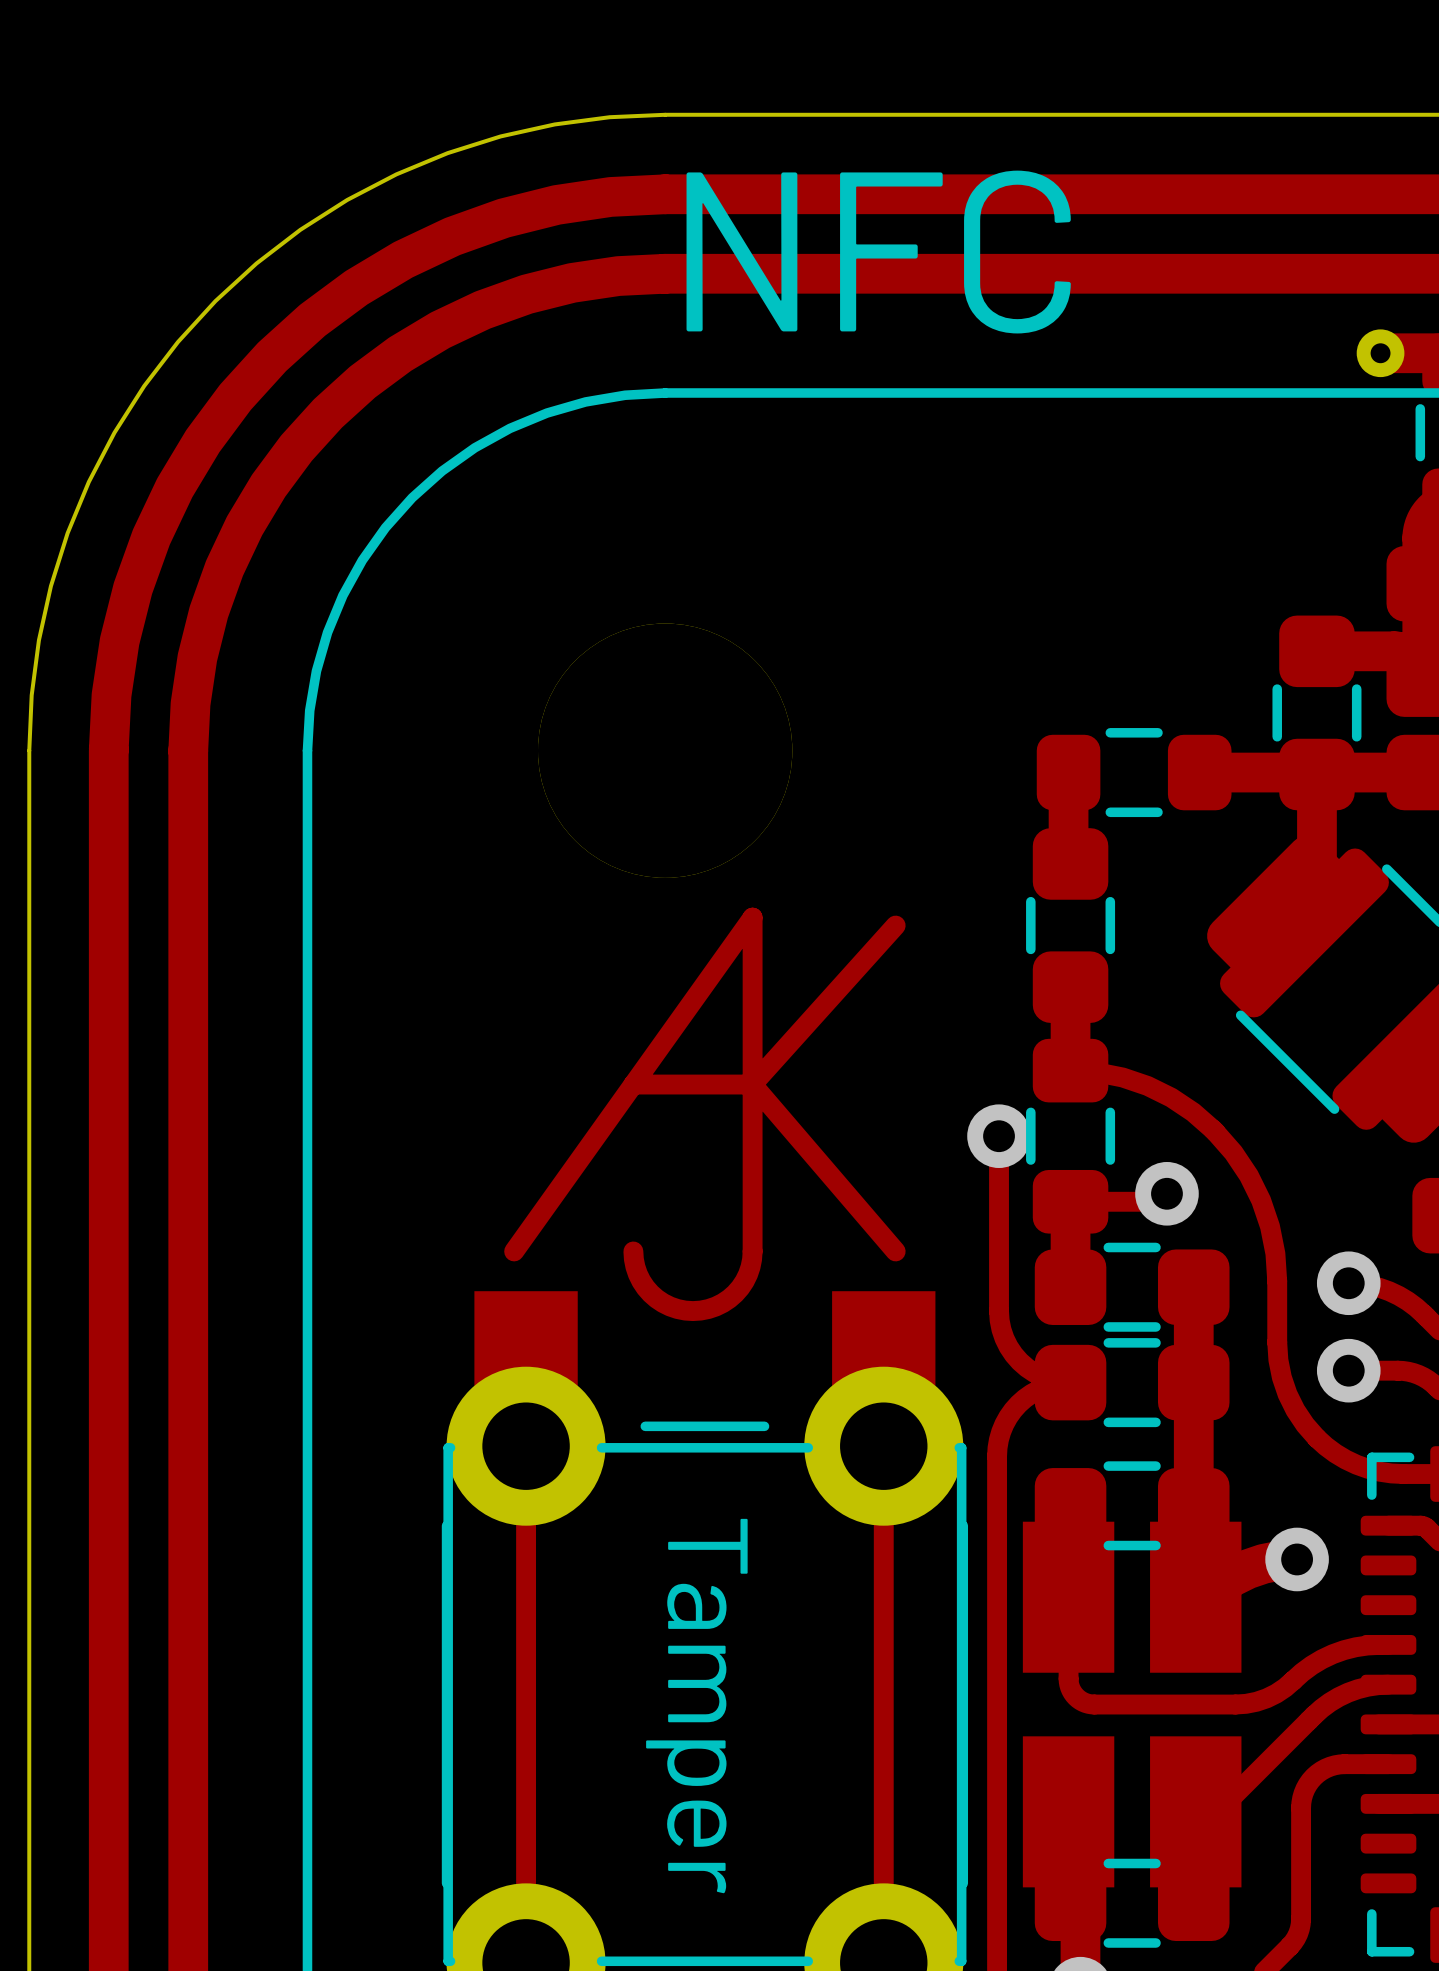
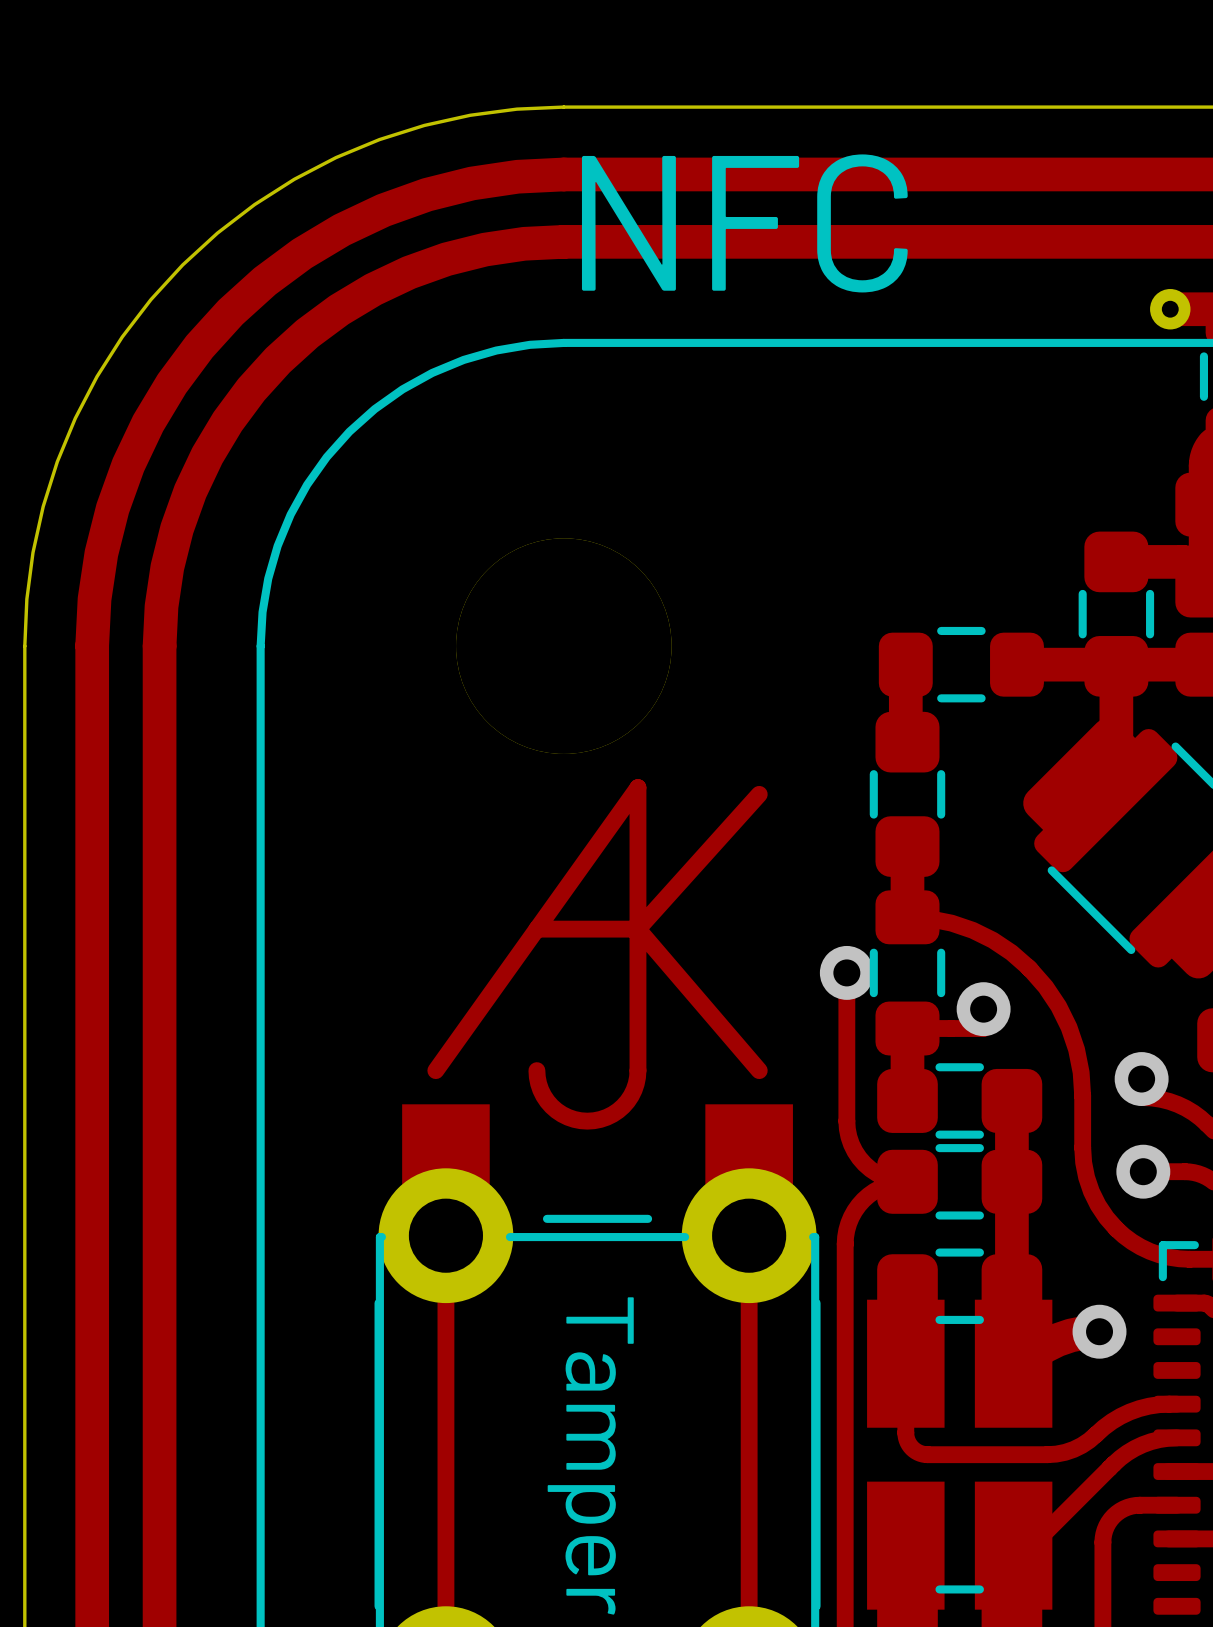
via position: (1166, 1193) -> (983, 1009)
via position: (1348, 1283) -> (1141, 1079)

